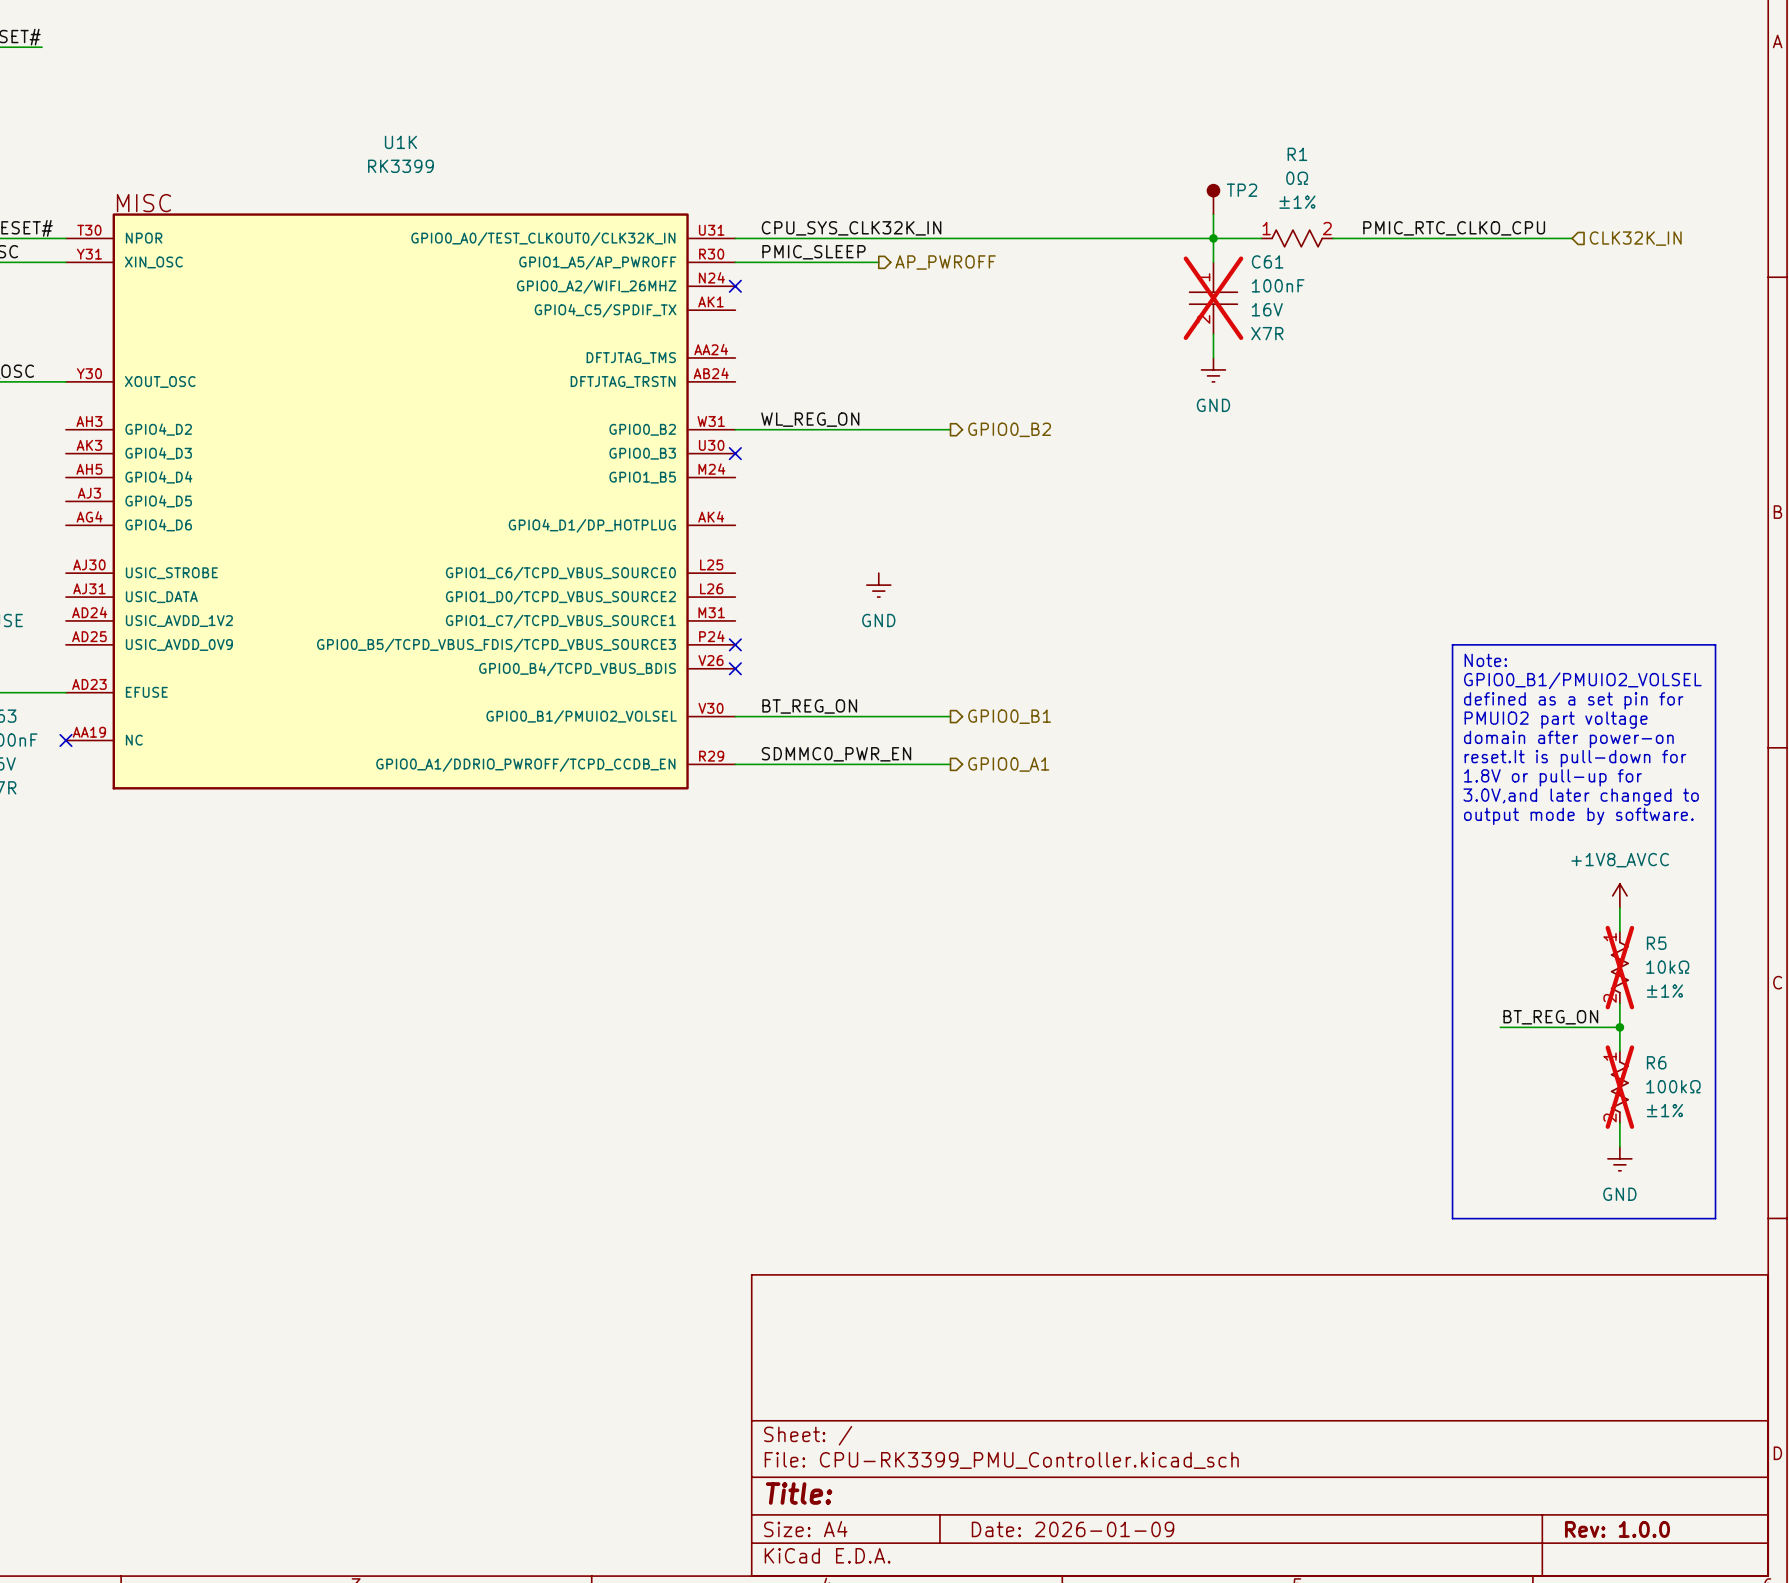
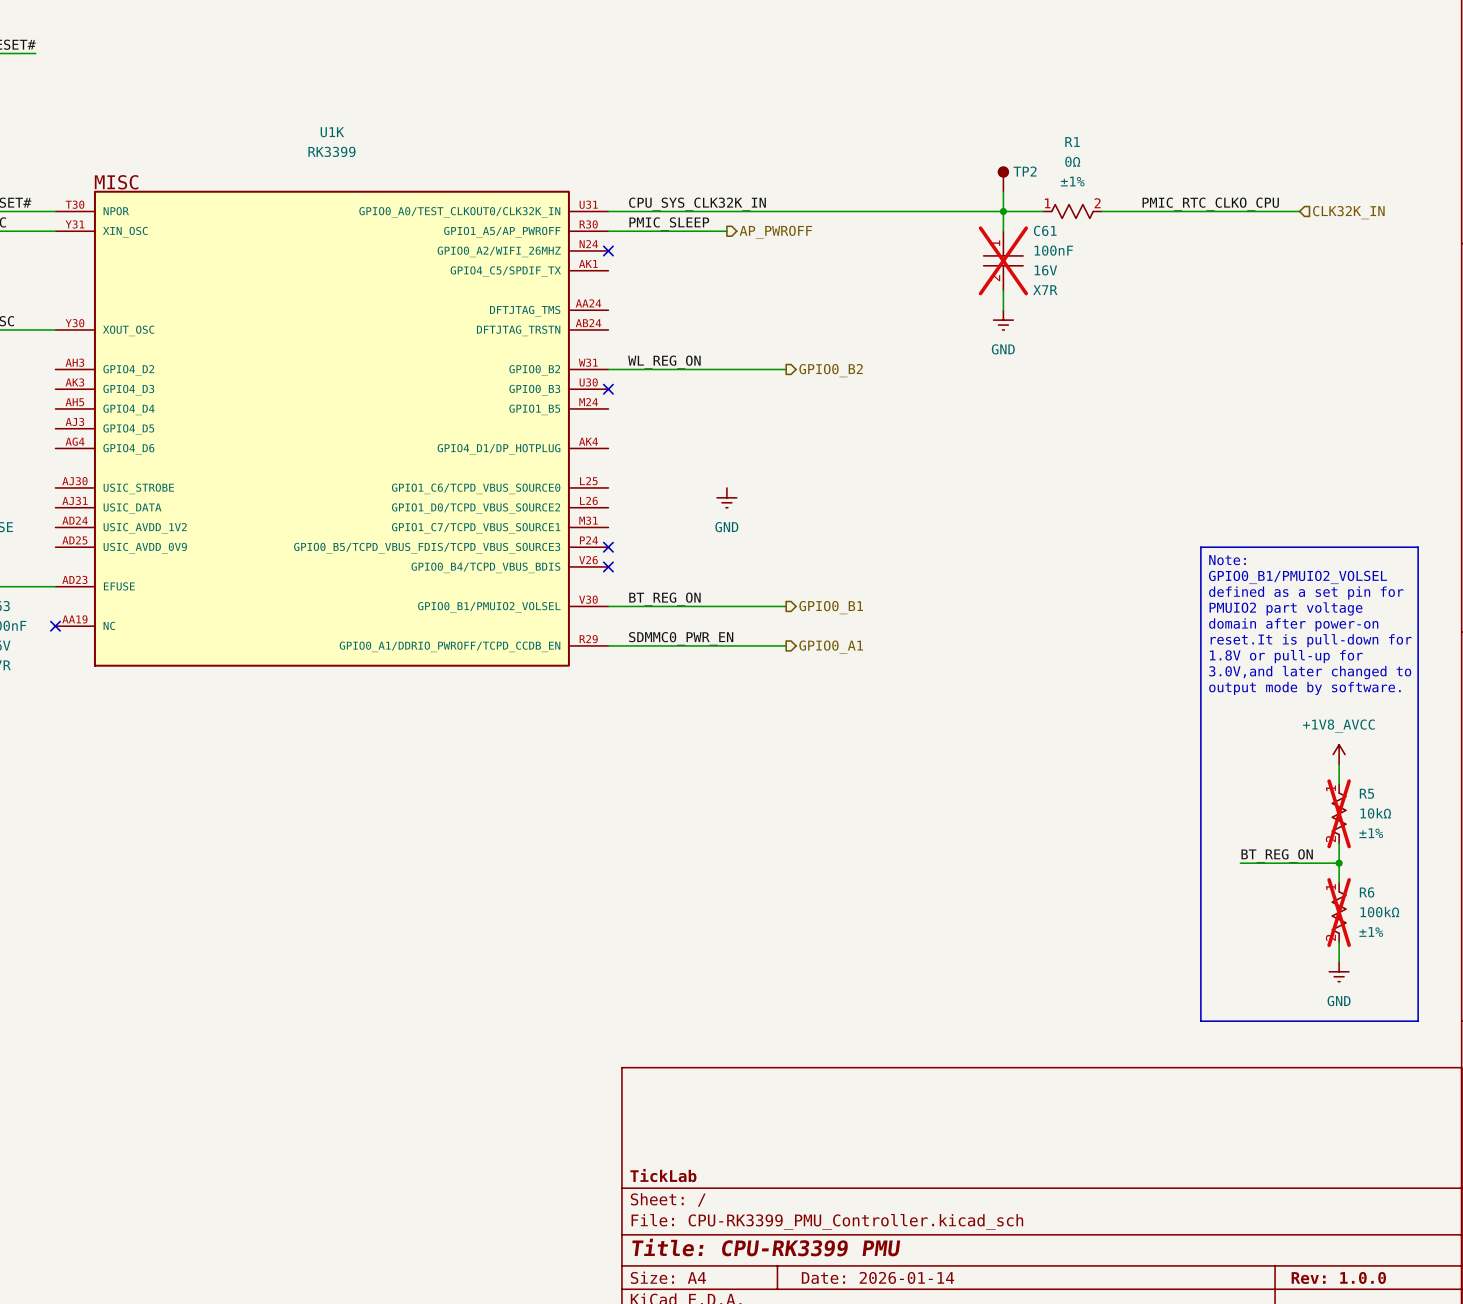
title block: none -> TickLab (663, 1175)
title block: Title: (799, 1493) -> Title: CPU-RK3399 PMU (766, 1247)
title block: Date: 2026-01-09 (1073, 1529) -> Date: 2026-01-14 (877, 1277)

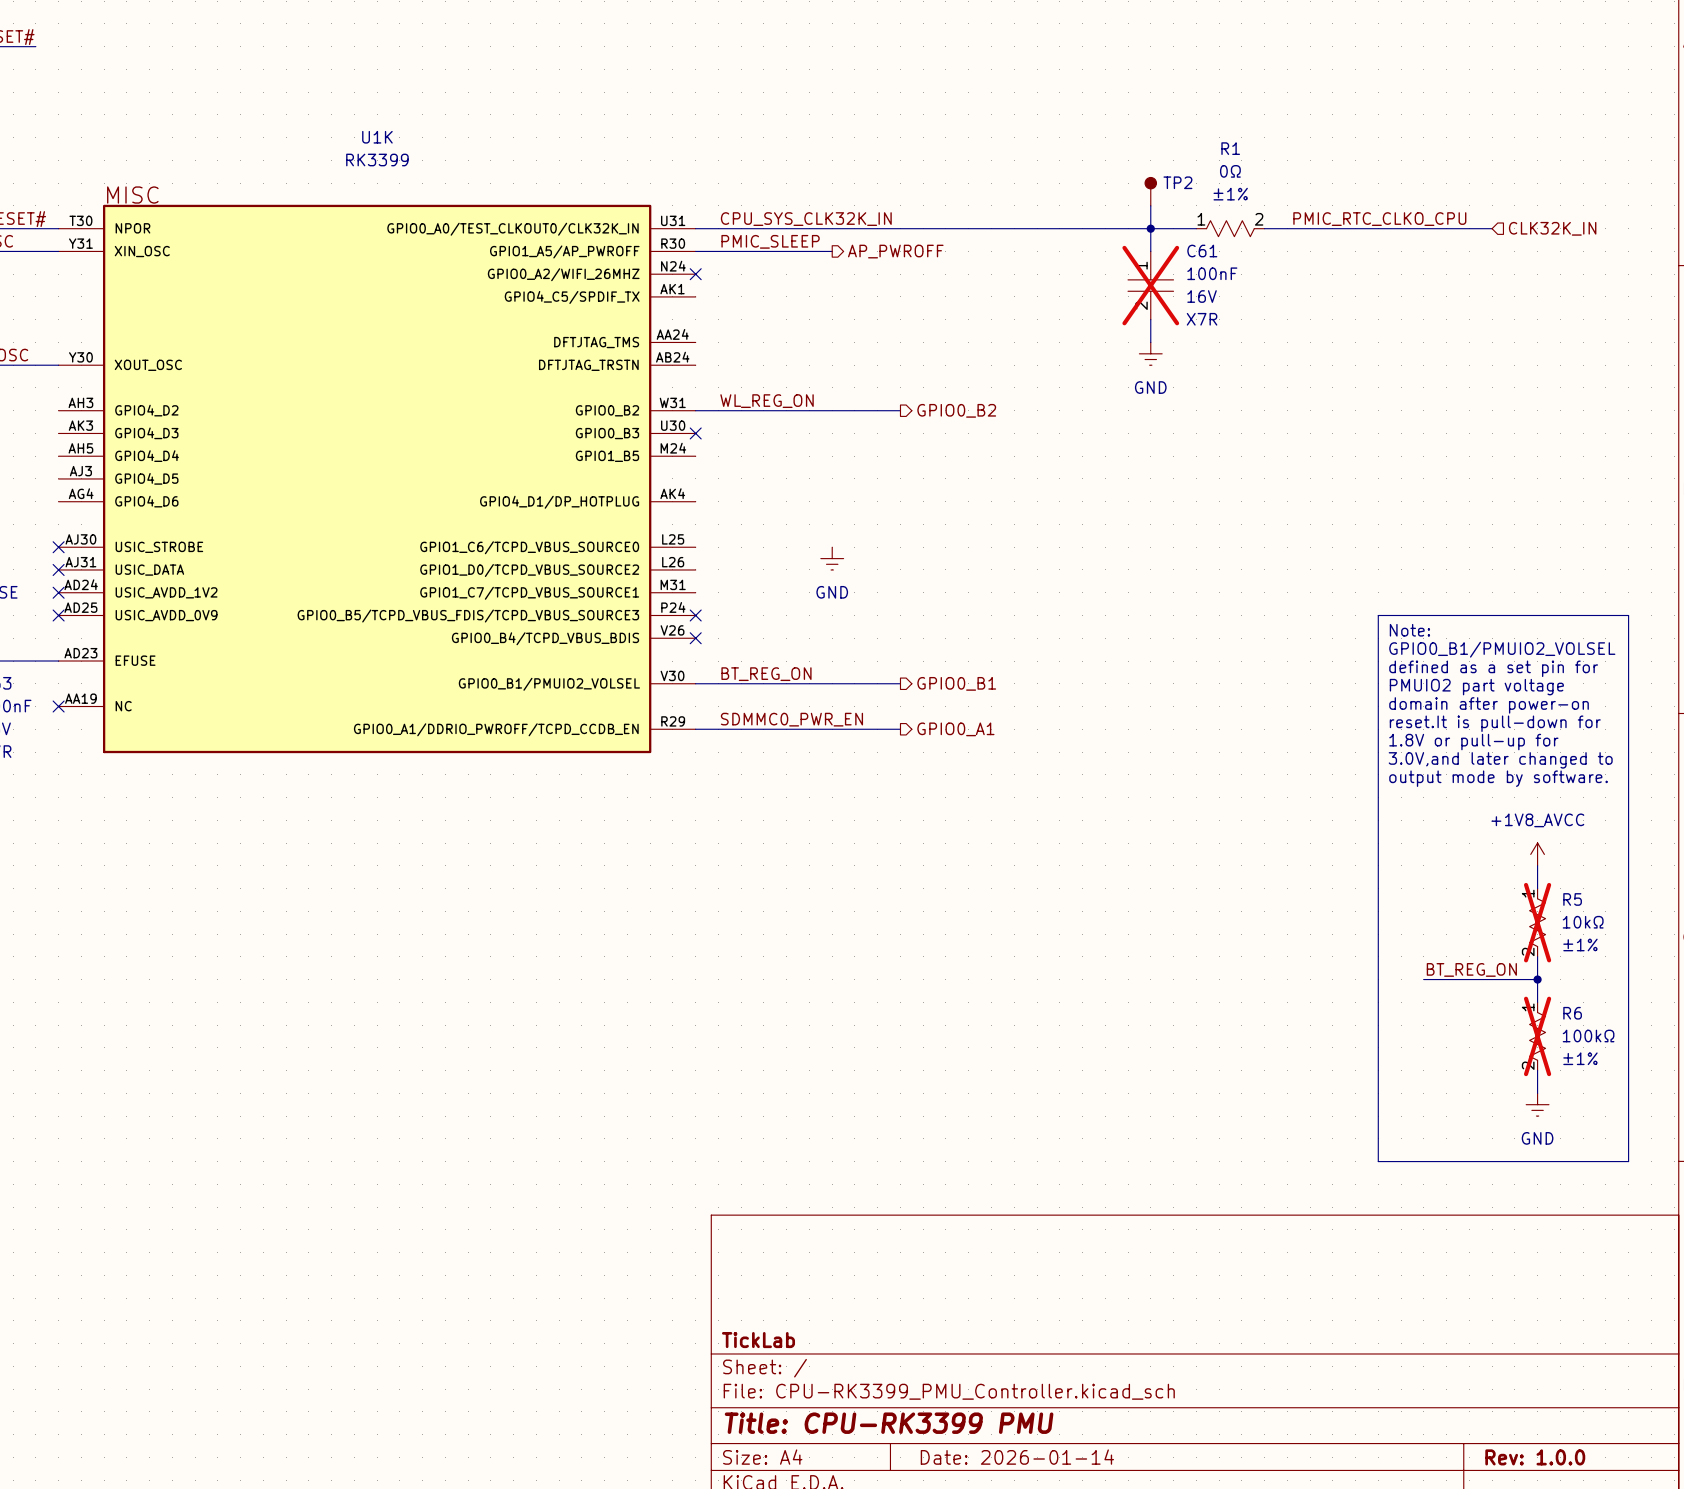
no-connect mark: none -> (58, 547)
no-connect mark: none -> (58, 569)
no-connect mark: none -> (58, 592)
no-connect mark: none -> (58, 615)

